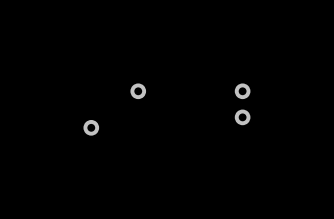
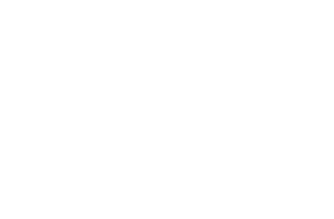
via: (138, 91) -> none
via: (242, 91) -> none
via: (242, 117) -> none
via: (91, 127) -> none

